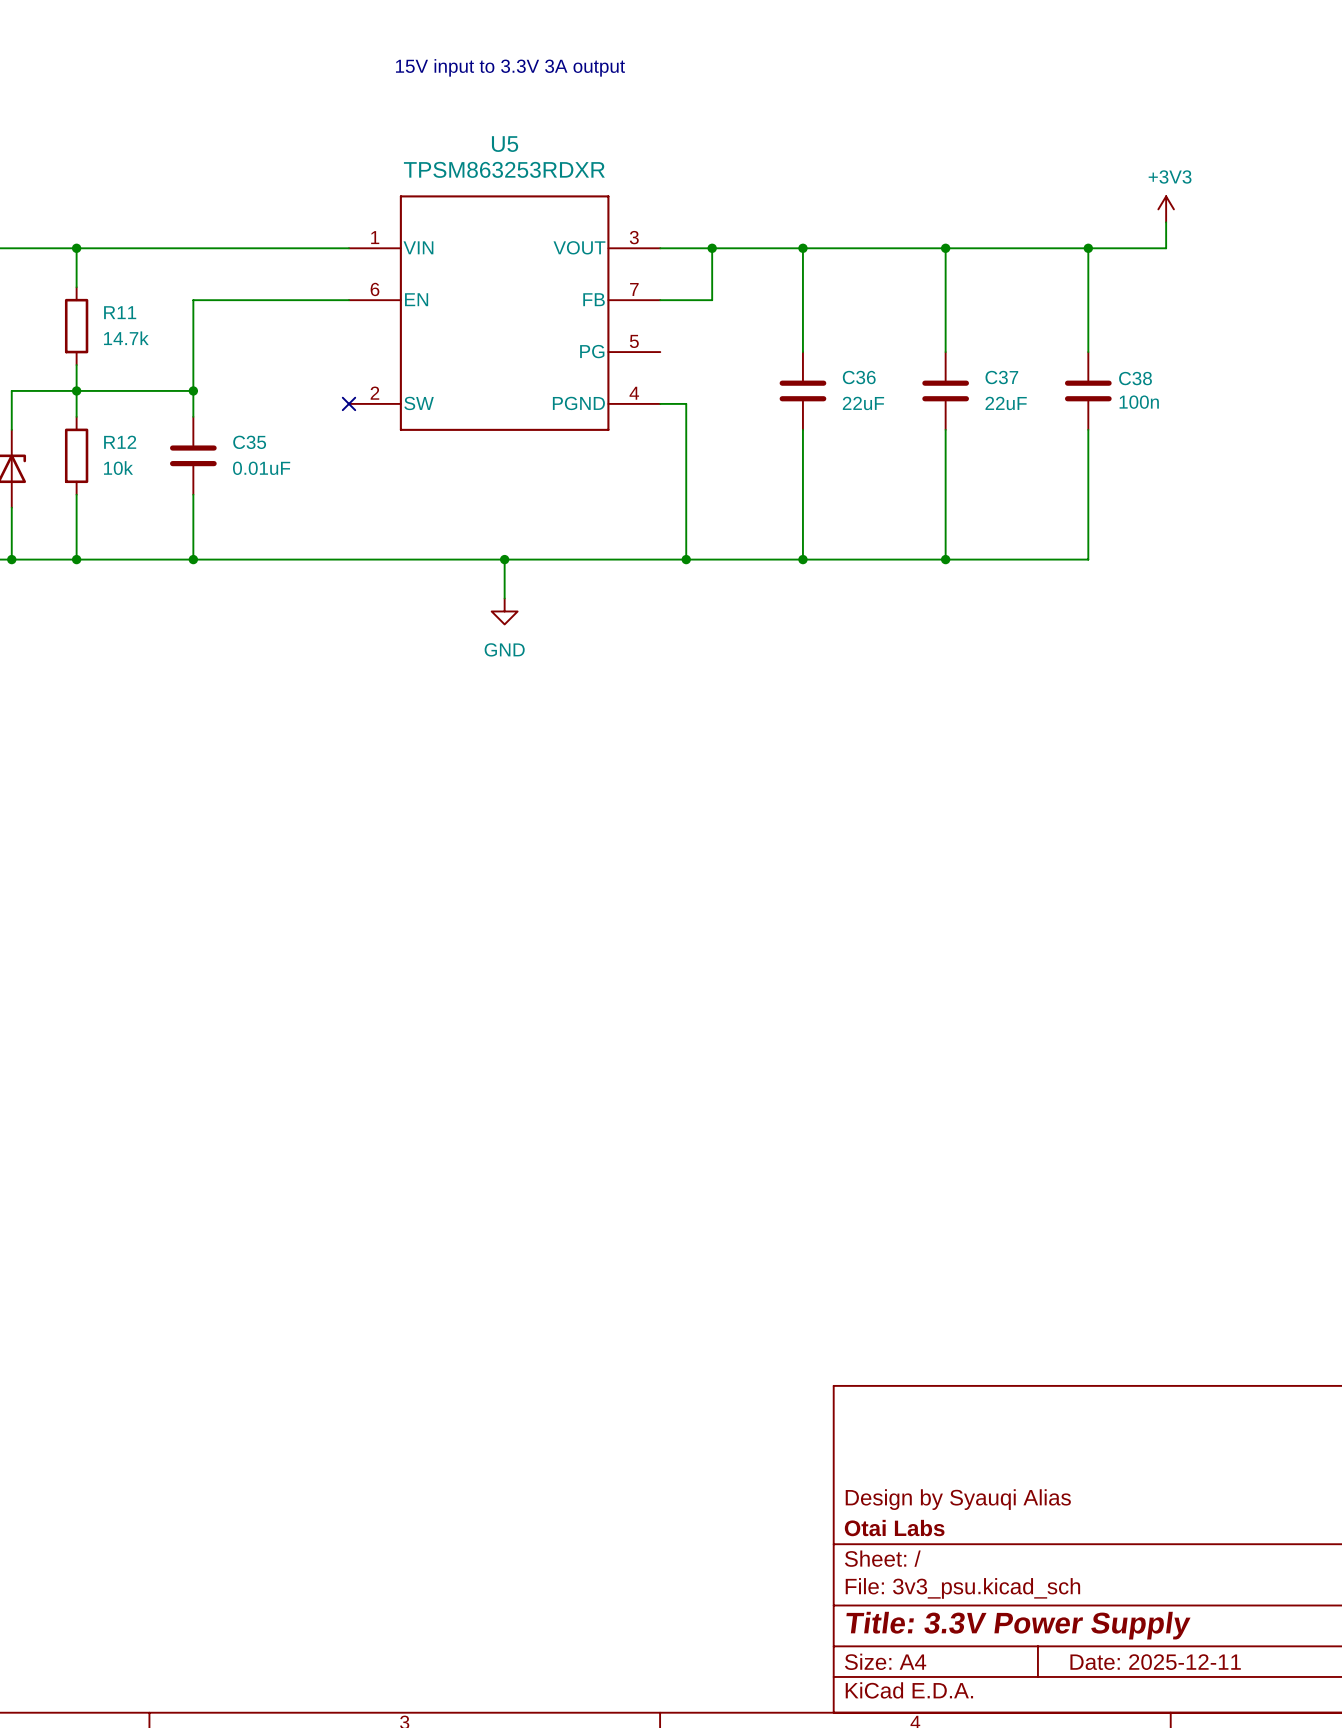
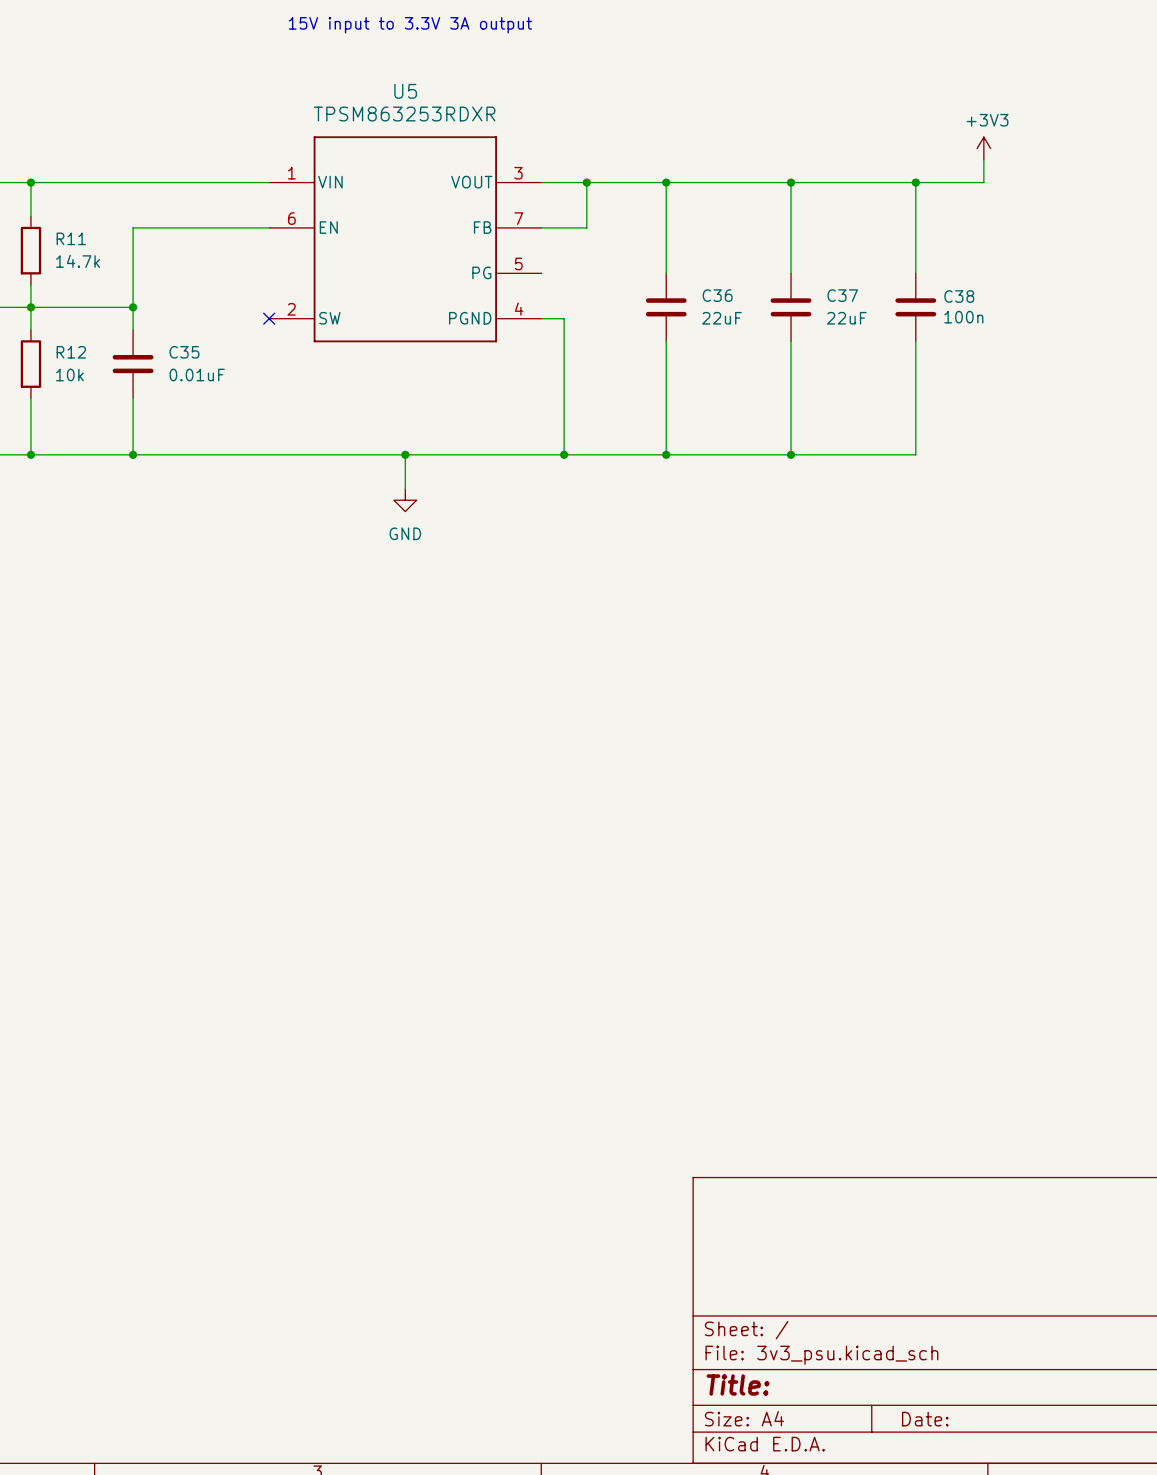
title block: Design by Syauqi Alias (958, 1499) -> none
title block: Otai Labs (894, 1528) -> none
title block: Title: 3.3V Power Supply (1018, 1625) -> Title: (738, 1384)
title block: Date: 2025-12-11 (1155, 1662) -> Date: (925, 1419)

